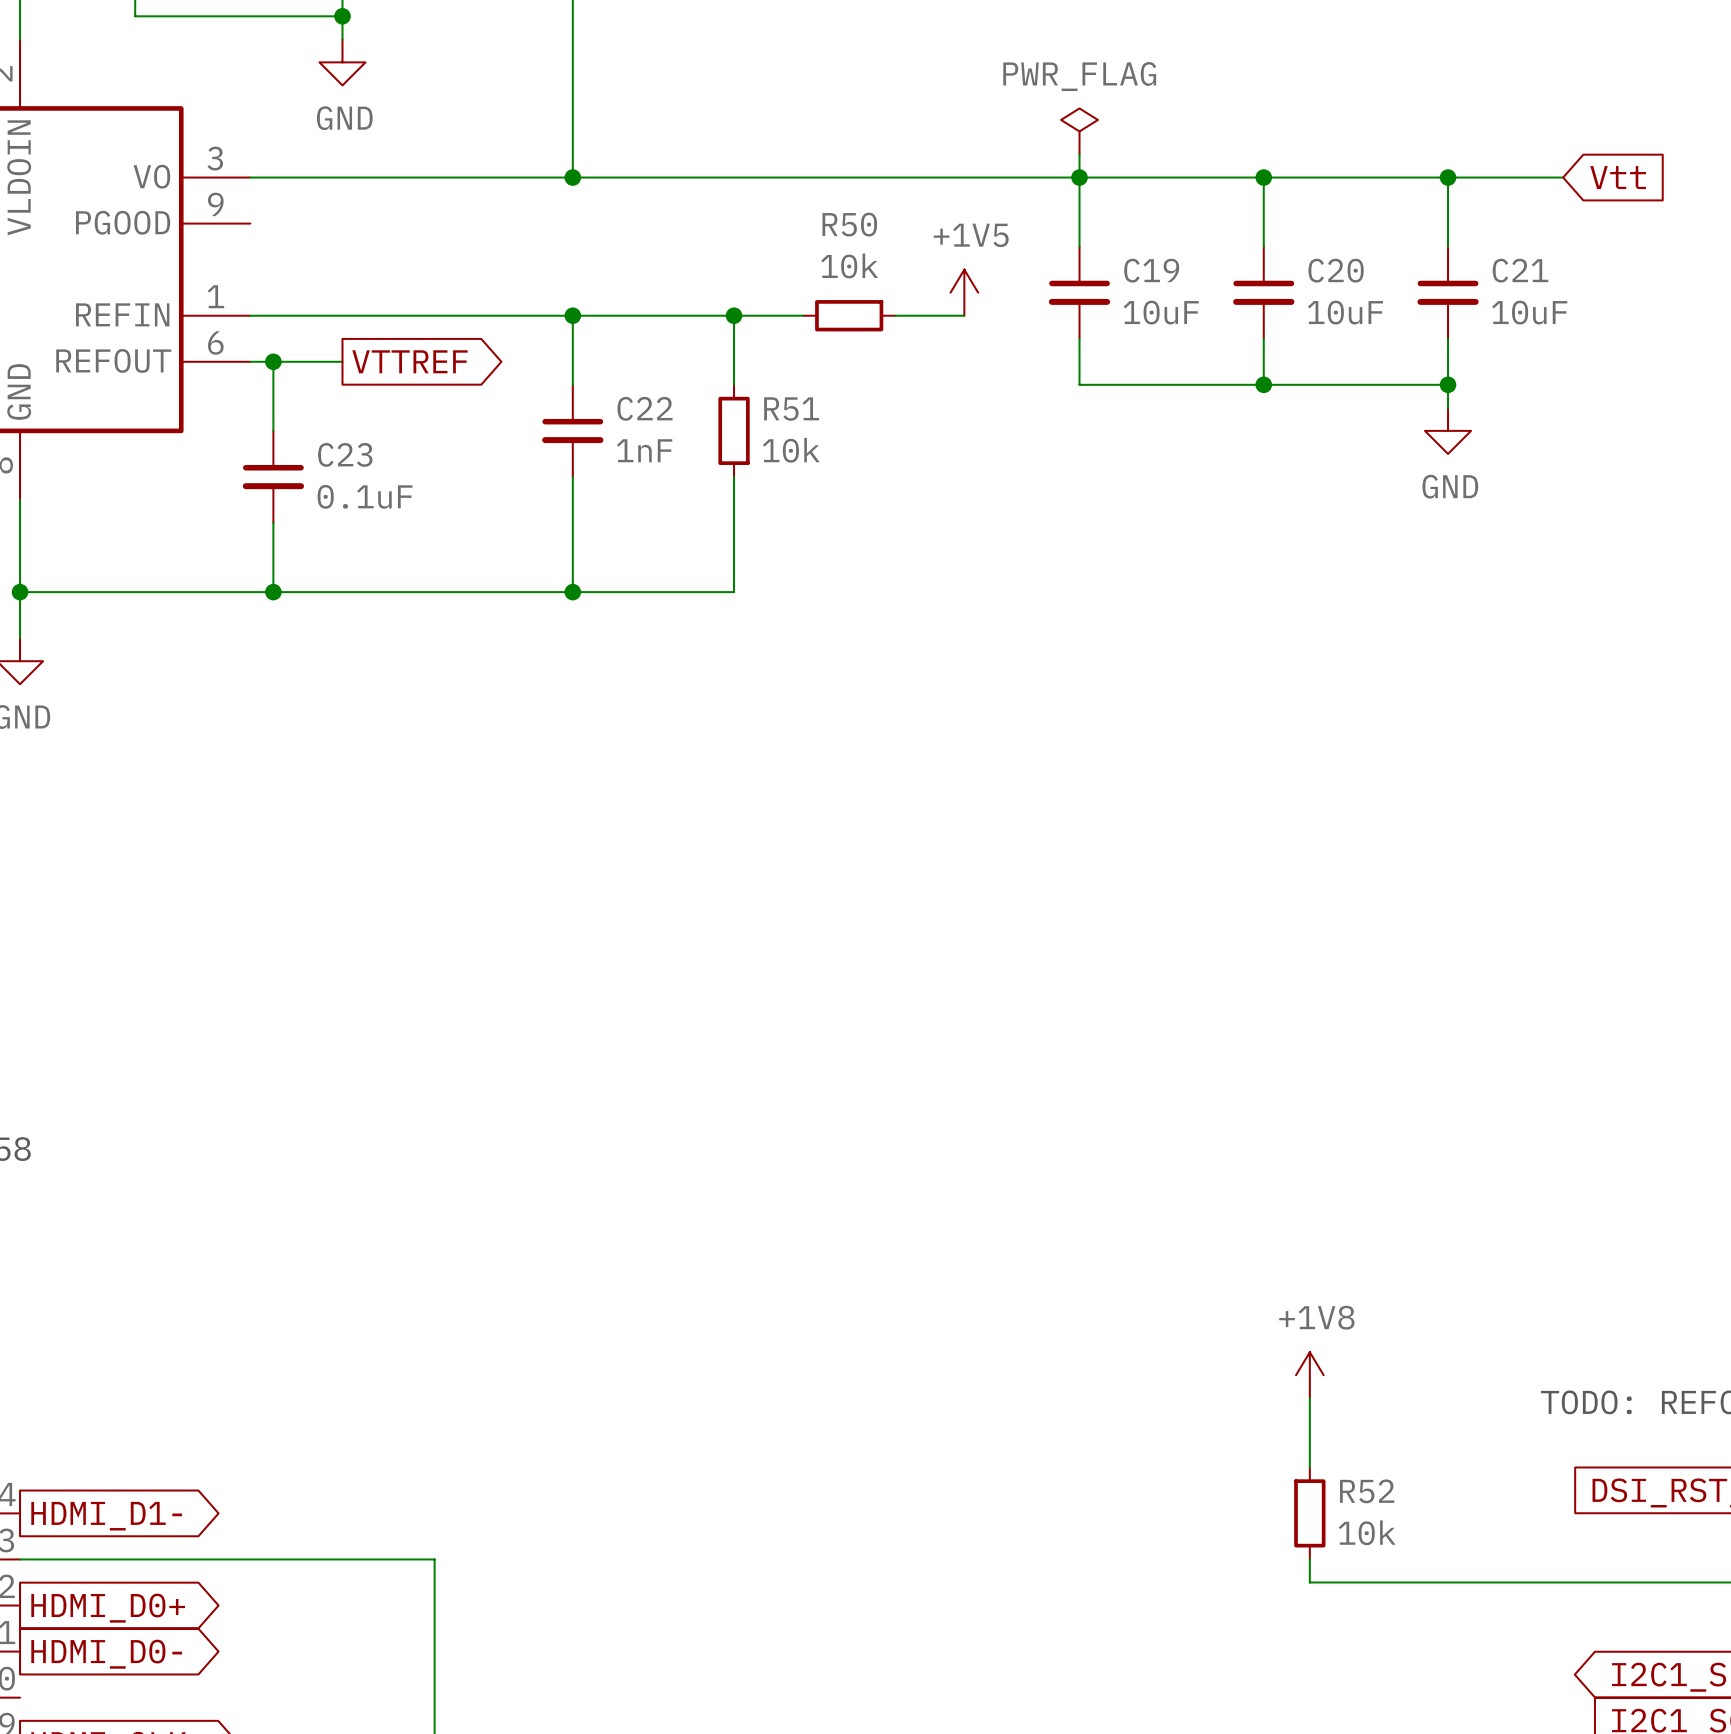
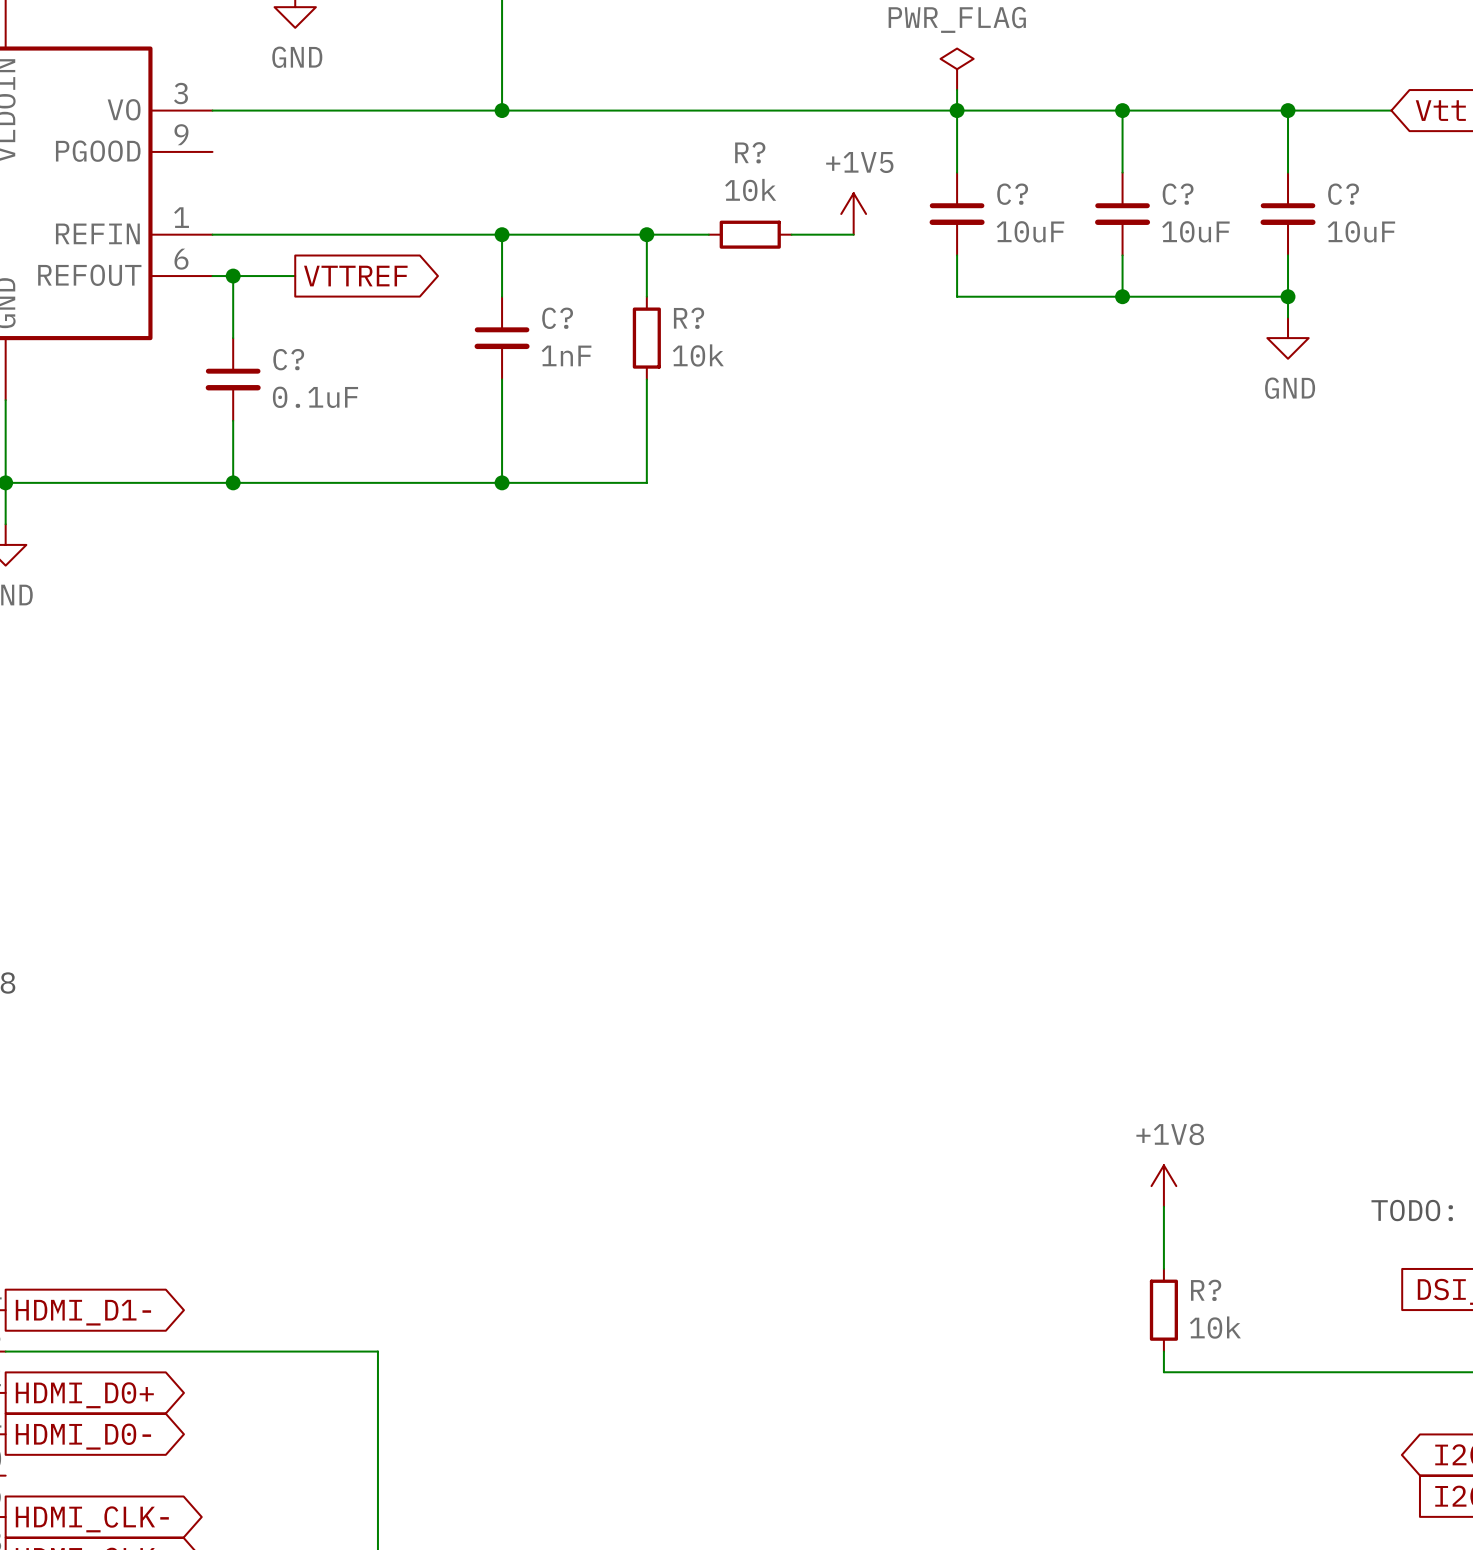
R50 name: R50 (849, 224) -> R? (750, 152)
C19 name: C19 (1151, 270) -> C? (1012, 194)
C20 name: C20 (1336, 270) -> C? (1178, 194)
C21 name: C21 (1520, 270) -> C? (1343, 194)
C22 name: C22 (645, 408) -> C? (557, 318)
R51 name: R51 (791, 409) -> R? (689, 318)
C23 name: C23 (345, 454) -> C? (288, 359)
R52 name: R52 (1367, 1491) -> R? (1206, 1290)

